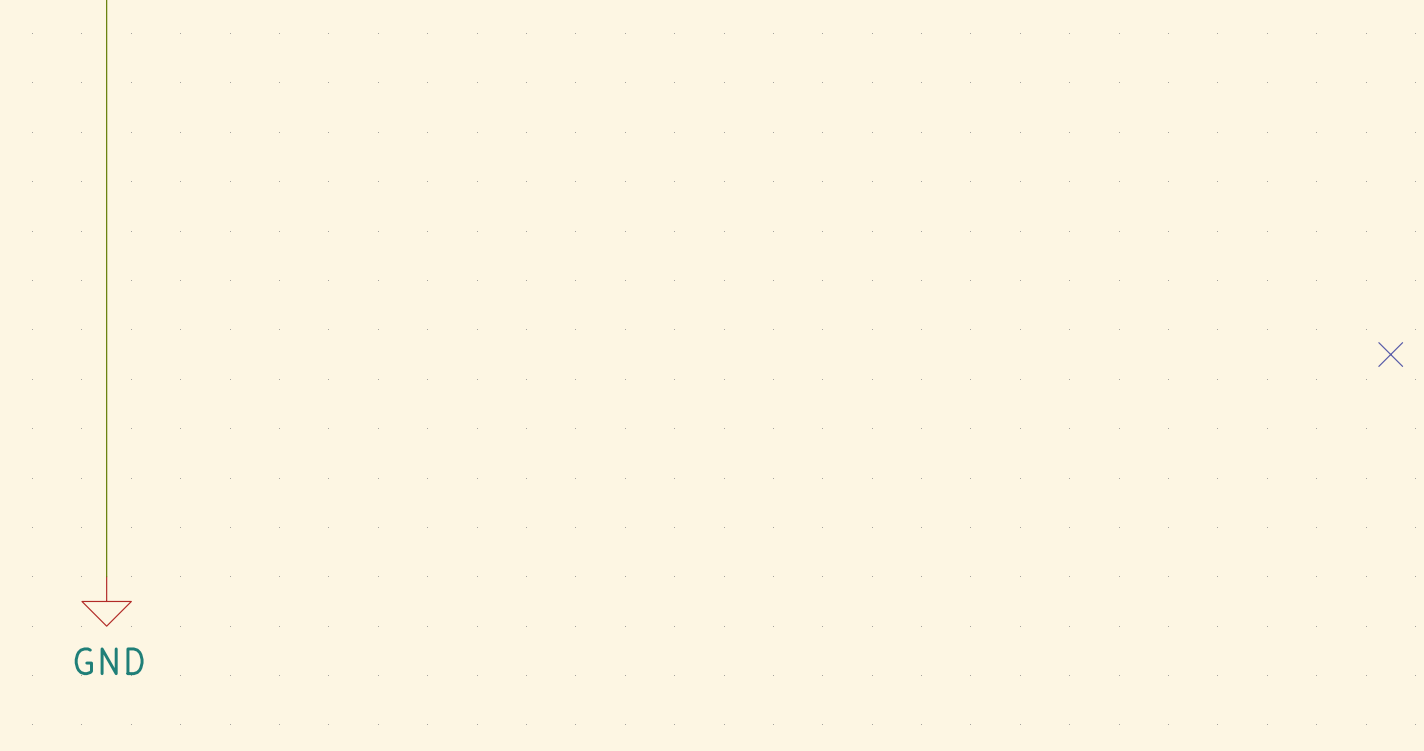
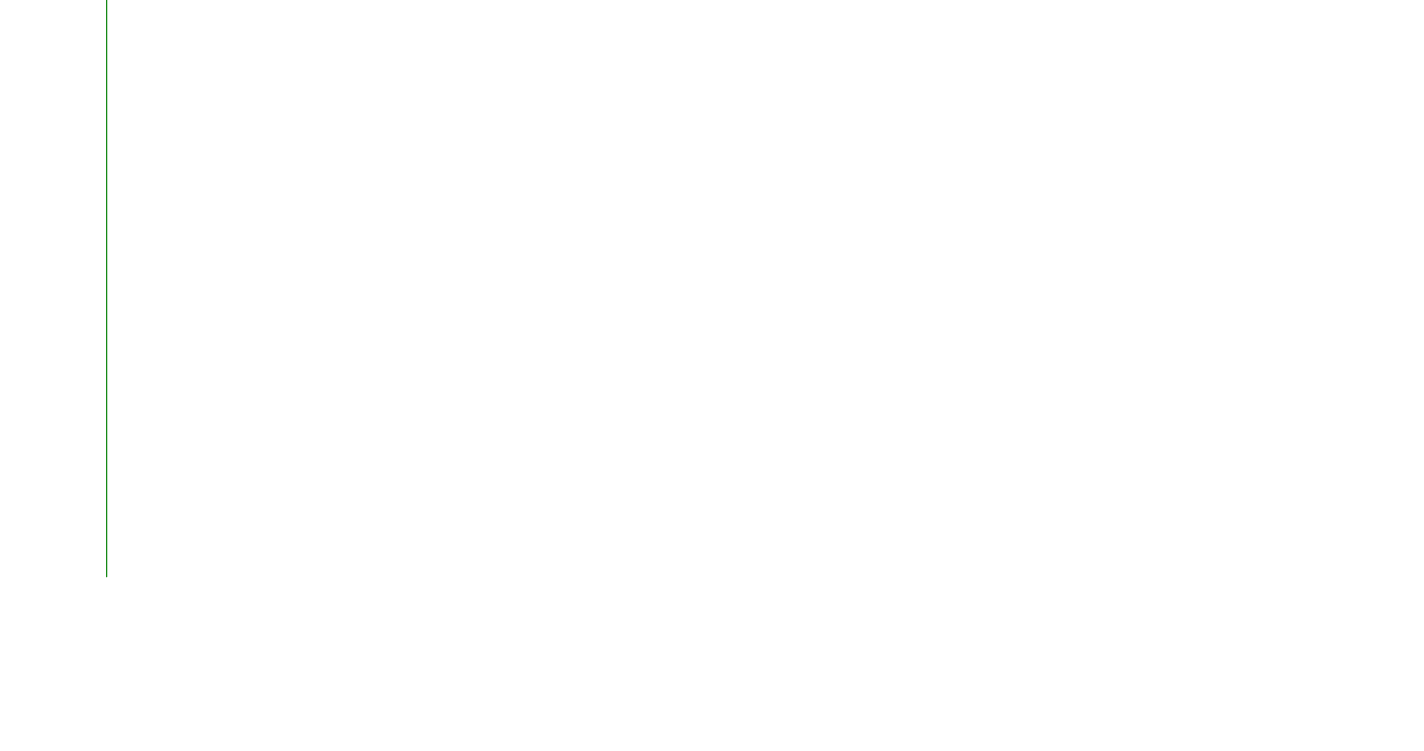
no-connect mark: (1390, 354) -> none
power symbol: GND (106, 601) -> none

